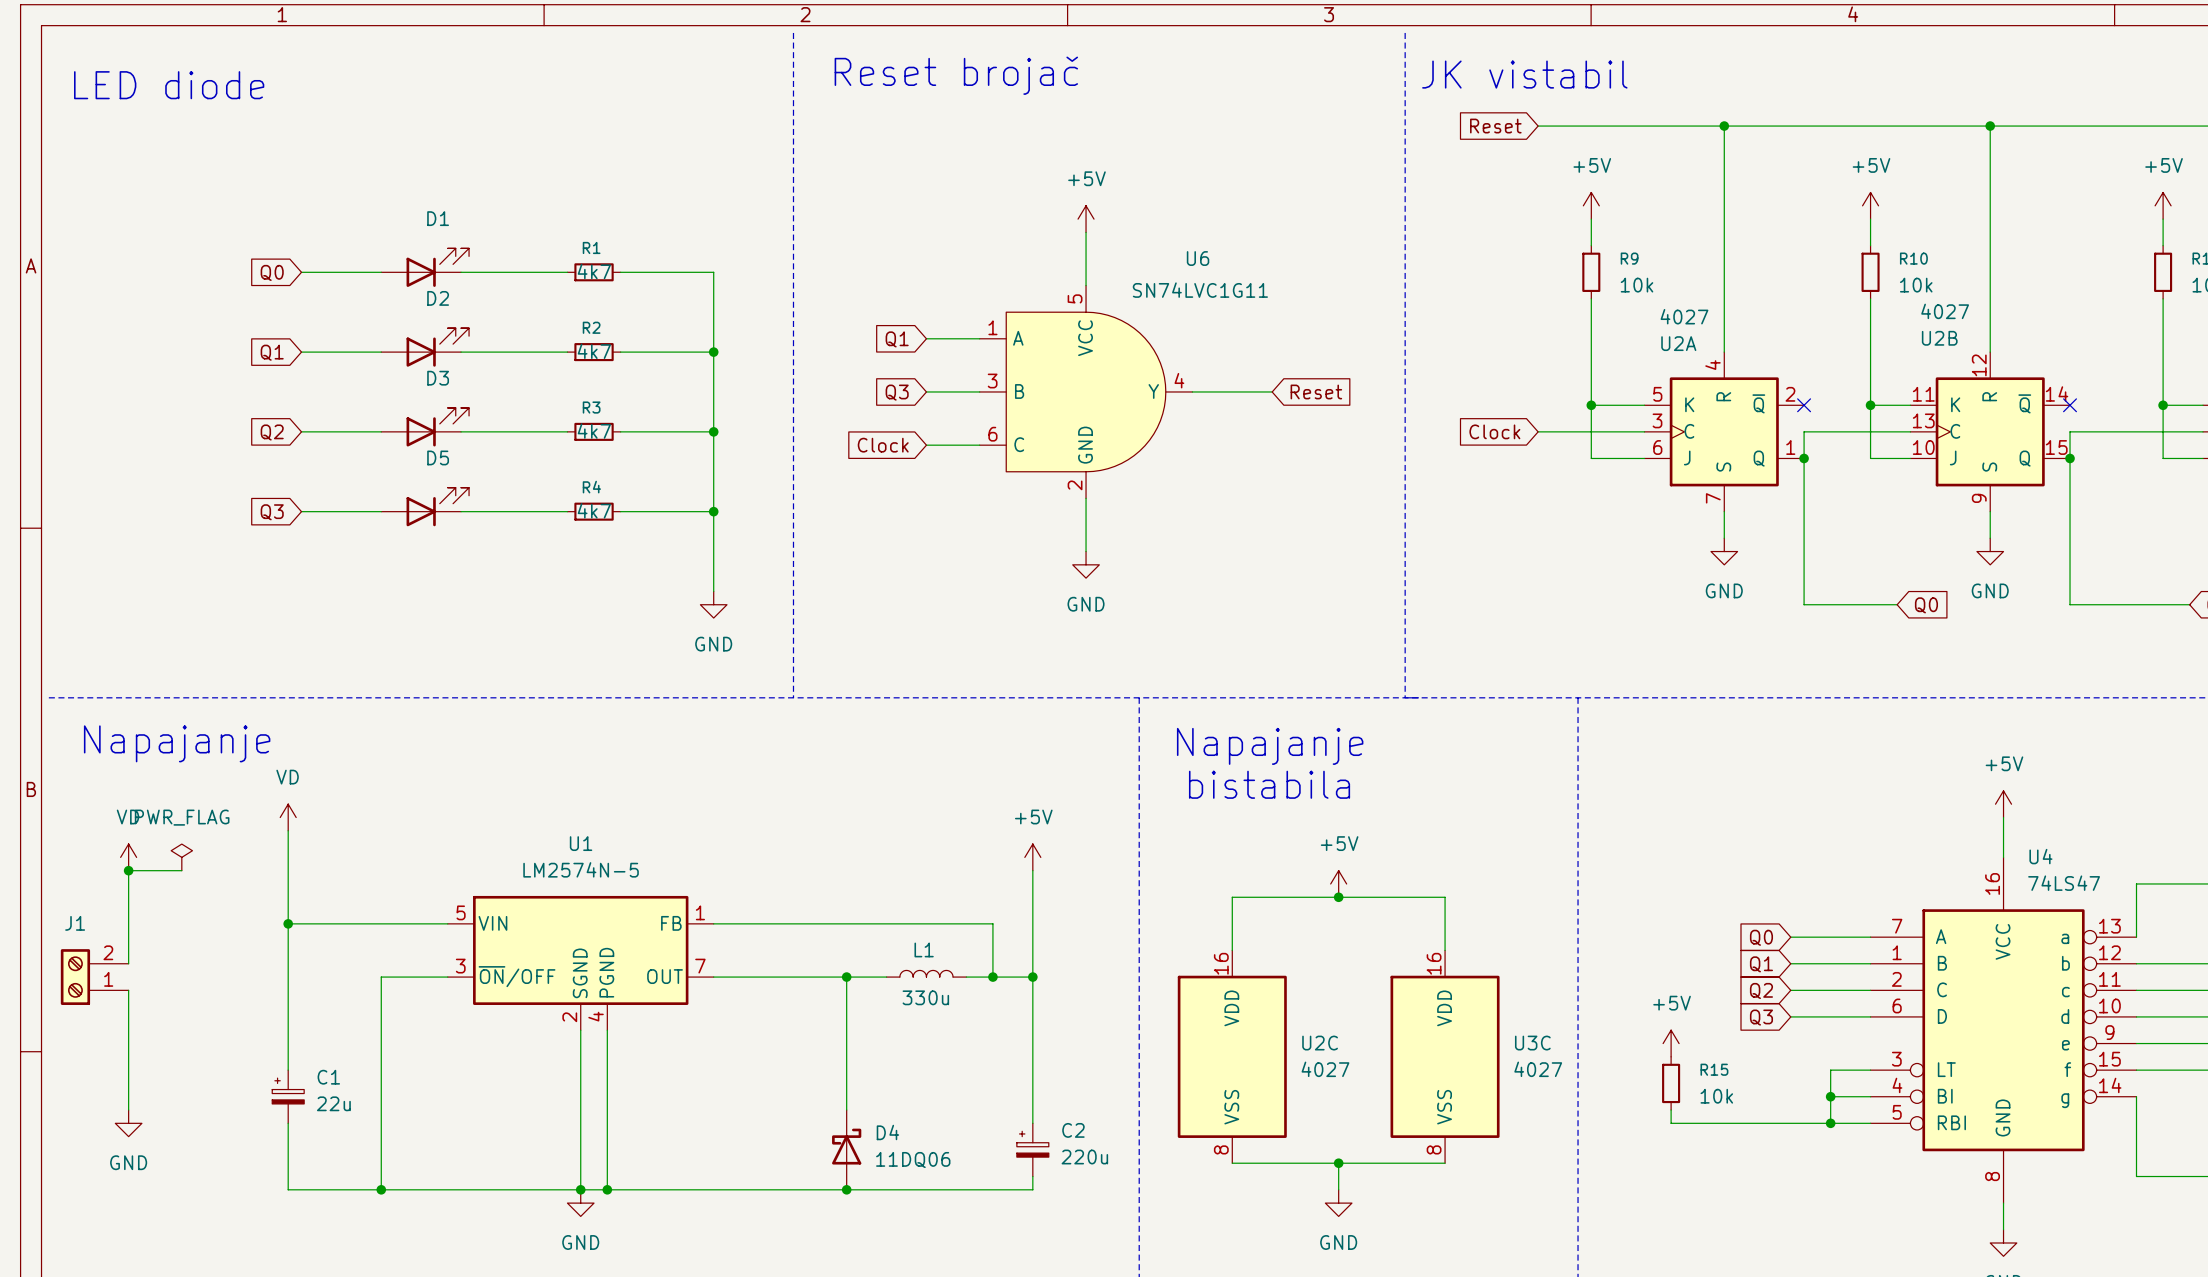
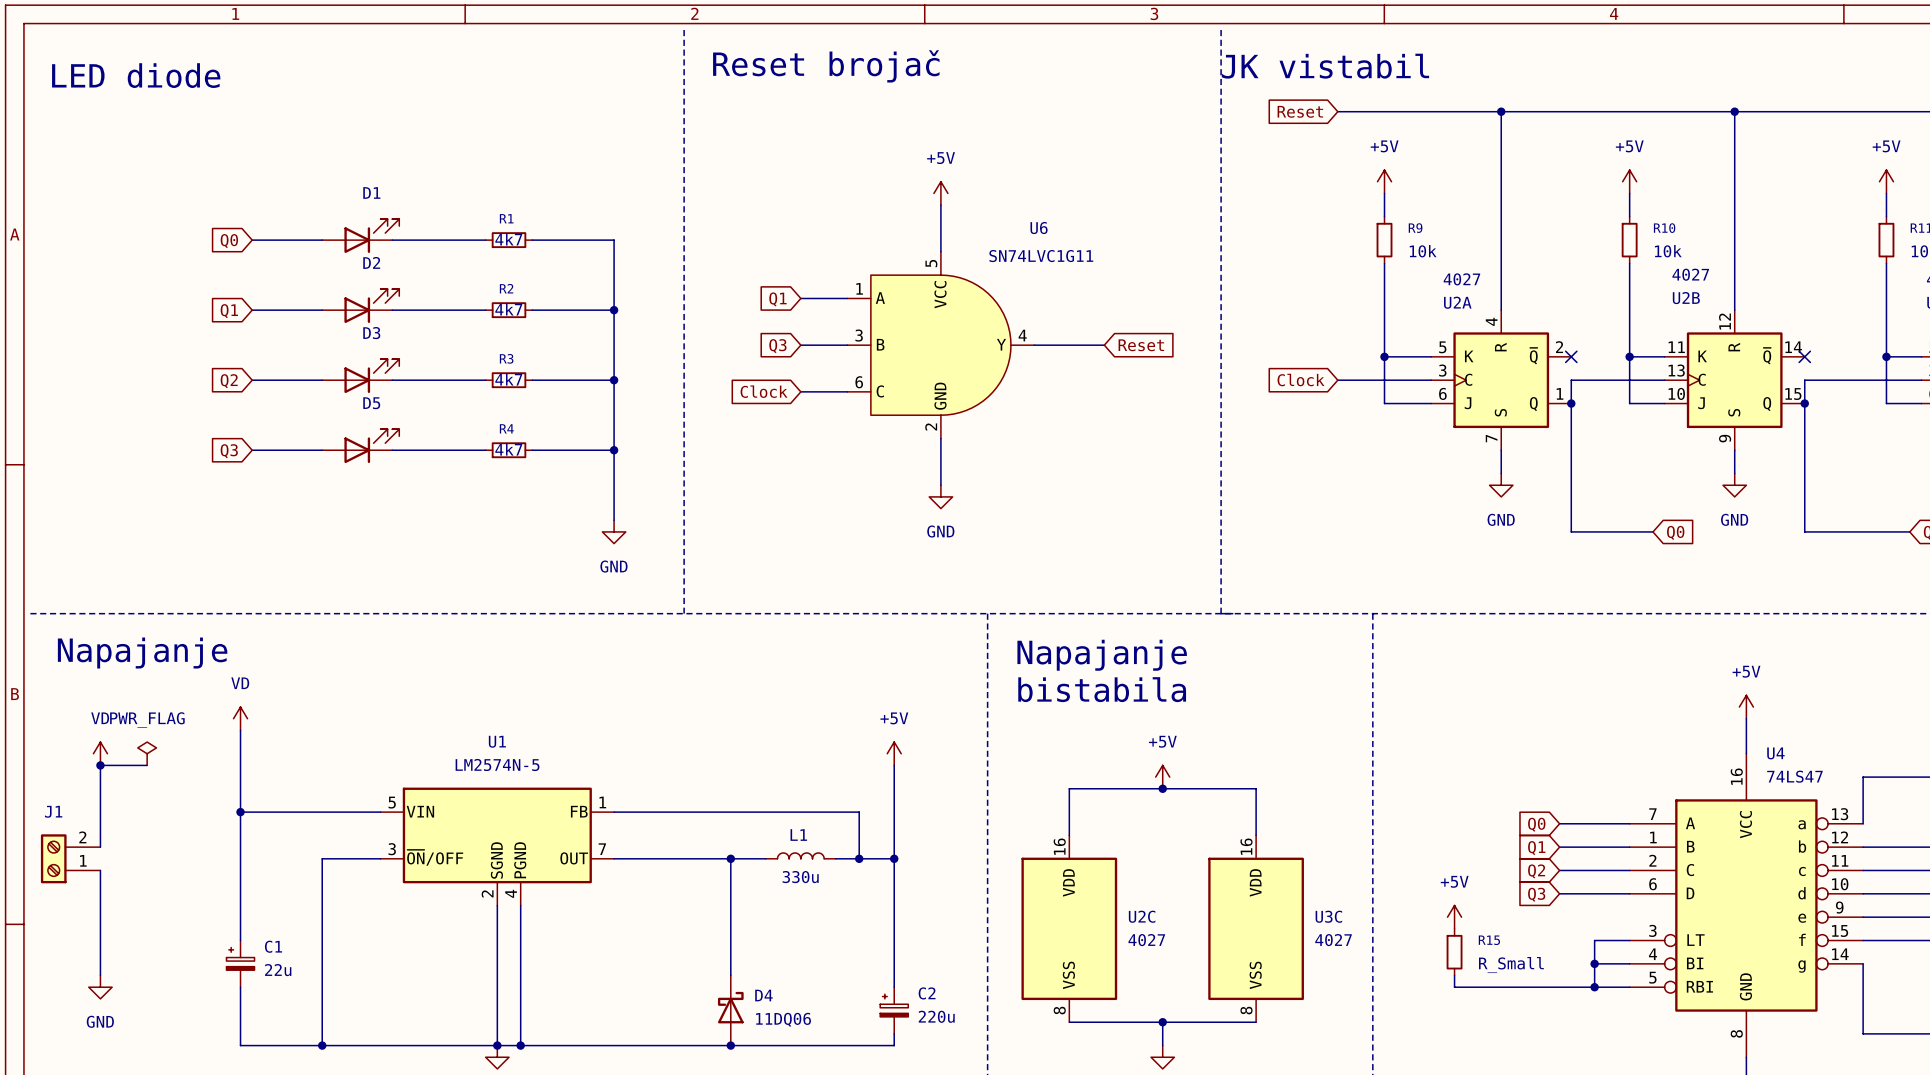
R15 value: 10k (1716, 1096) -> R_Small (1511, 965)

